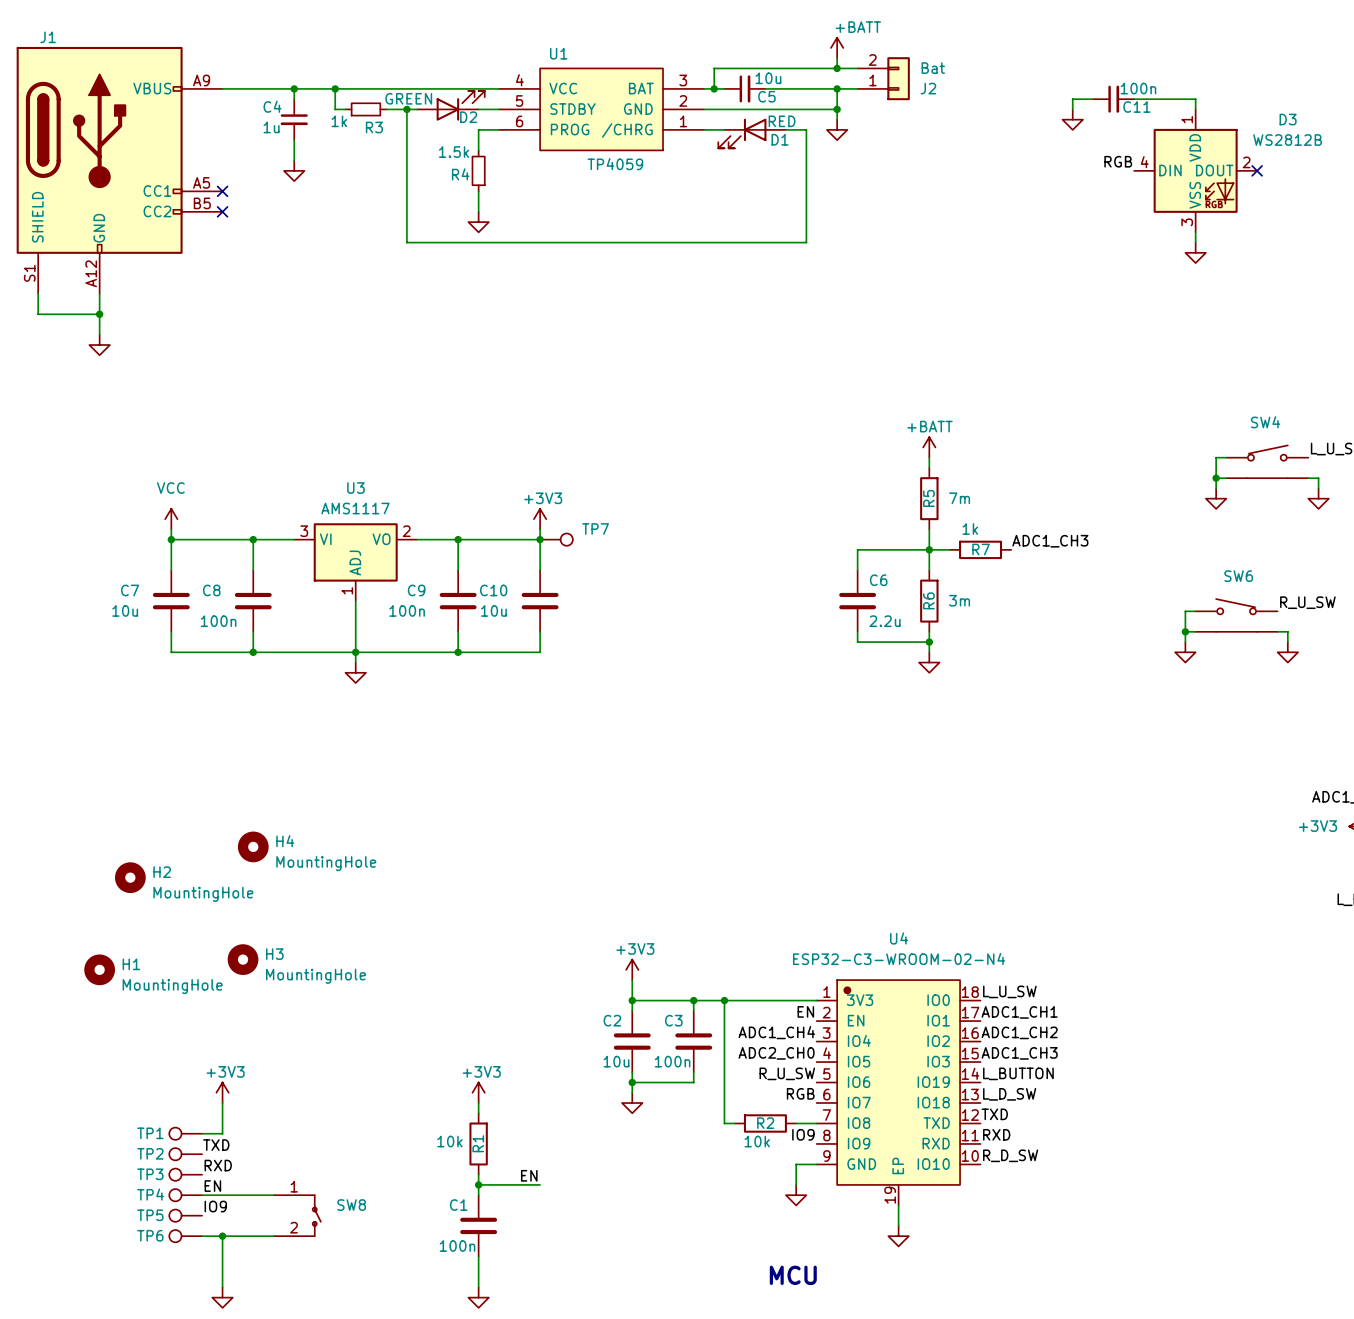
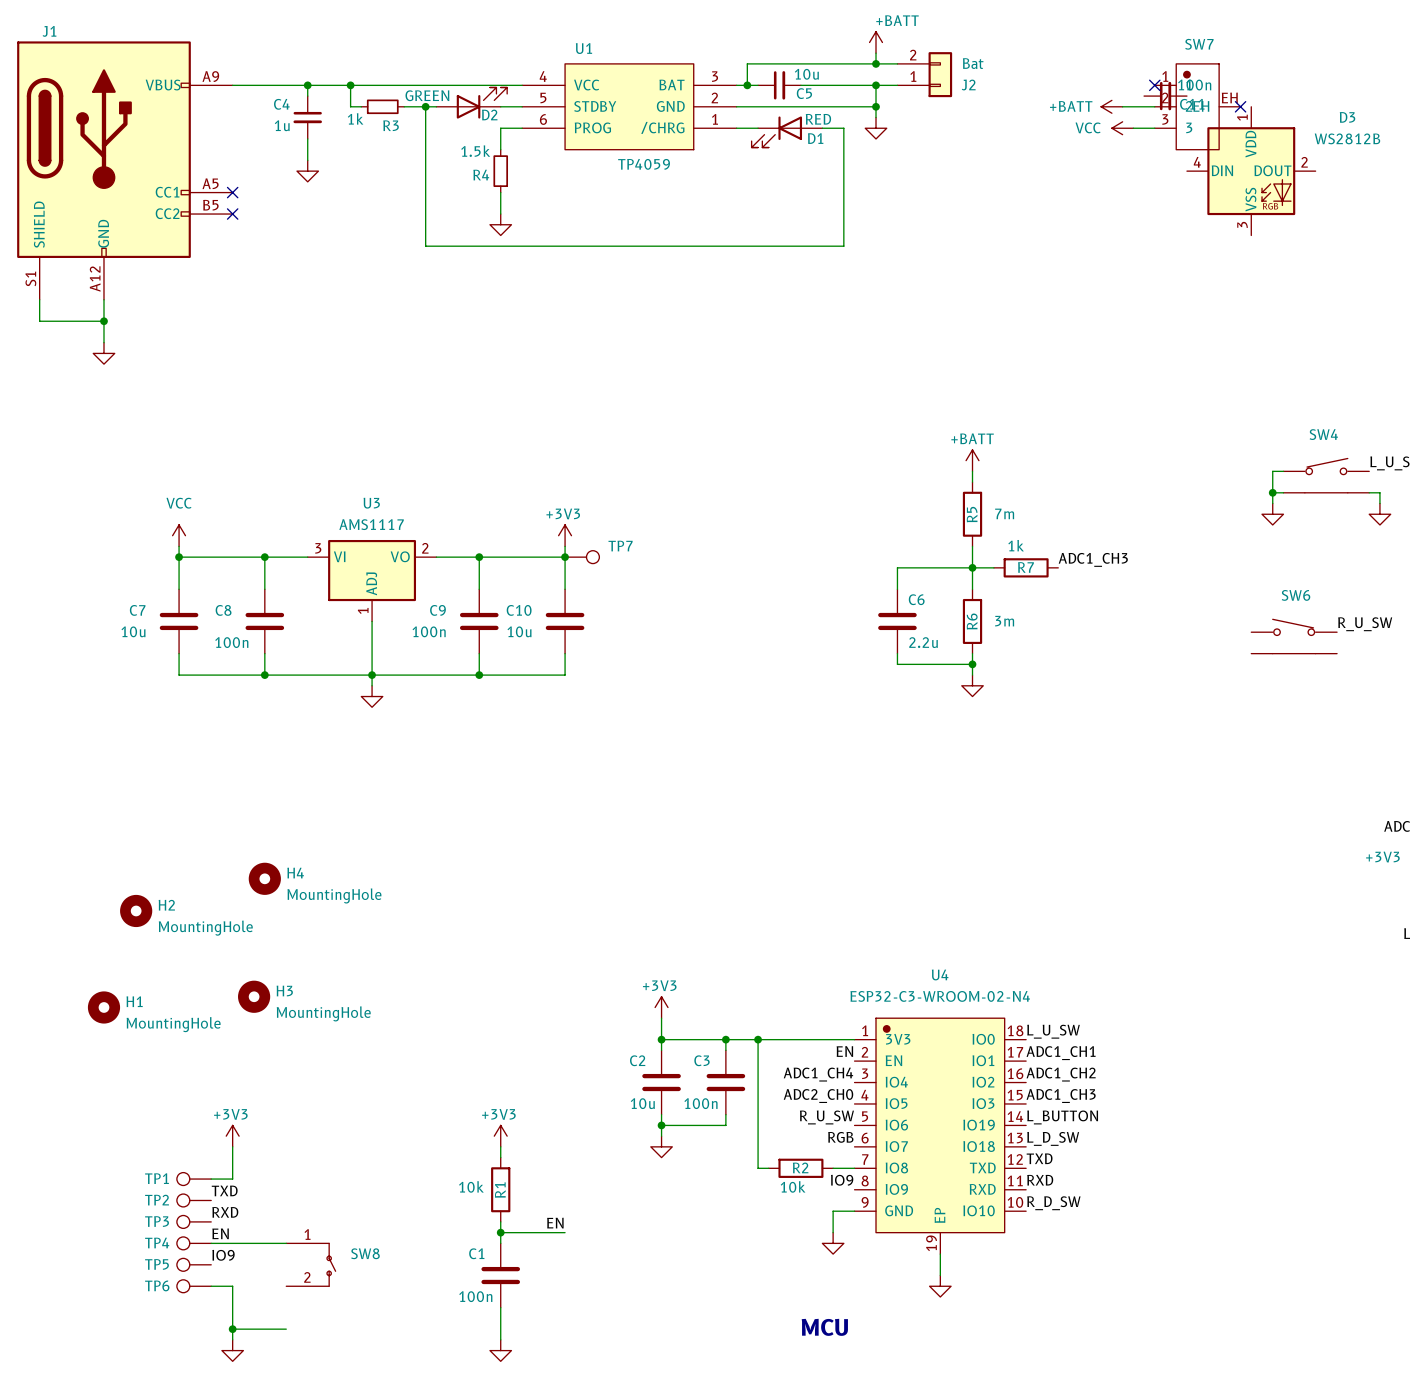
no-connect mark: none -> (1154, 85)
wire: (1093, 99) (1072, 99) (1072, 109) -> (1154, 106) (1122, 106)
wire: (1134, 99) (1195, 99) (1195, 109) -> none
power symbol: none -> +BATT (1111, 106)
SW7: none -> (1197, 106)
no-connect mark: none -> (1240, 106)
power symbol: (1072, 119) -> none
power symbol: none -> VCC (1122, 128)
wire: none -> (1133, 128) (1154, 128)
label: RGB (1118, 161) -> none
no-connect mark: (1257, 170) -> none
wire: (1195, 232) (1195, 242) -> none
power symbol: (1195, 252) -> none
wire: (1195, 611) (1185, 611) (1185, 642) -> none
wire: (1185, 631) (1195, 631) -> none
junction: (1185, 631) -> none
wire: (1277, 631) (1287, 631) (1287, 642) -> none
power symbol: (1185, 652) -> none
power symbol: (1287, 652) -> none
wire: (222, 1236) (273, 1236) -> (232, 1329) (286, 1329)
junction position: (222, 1236) -> (232, 1329)

